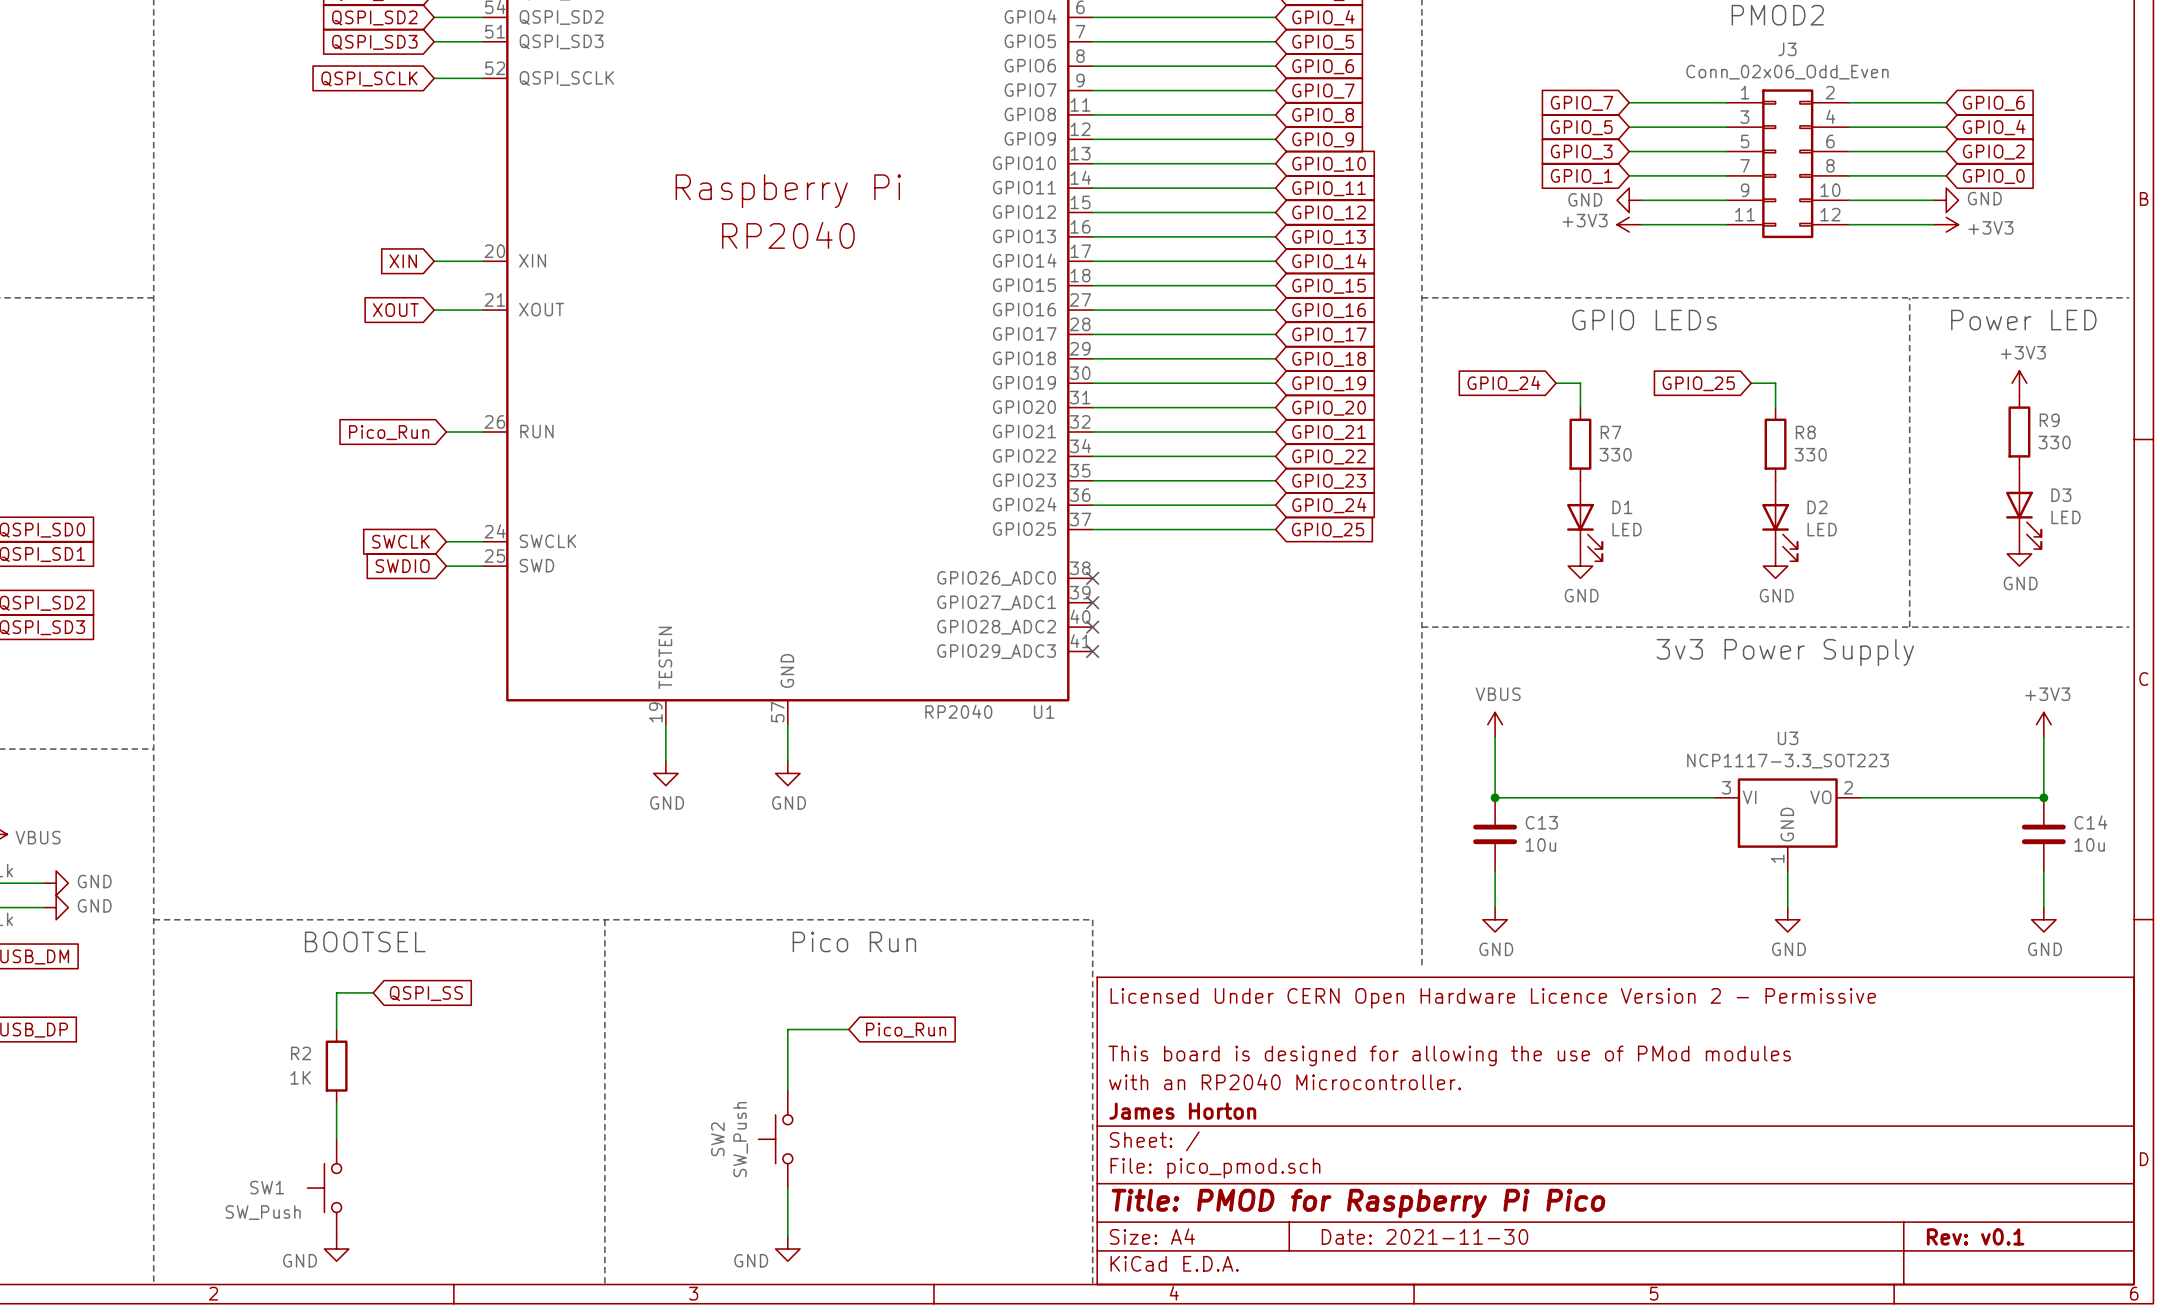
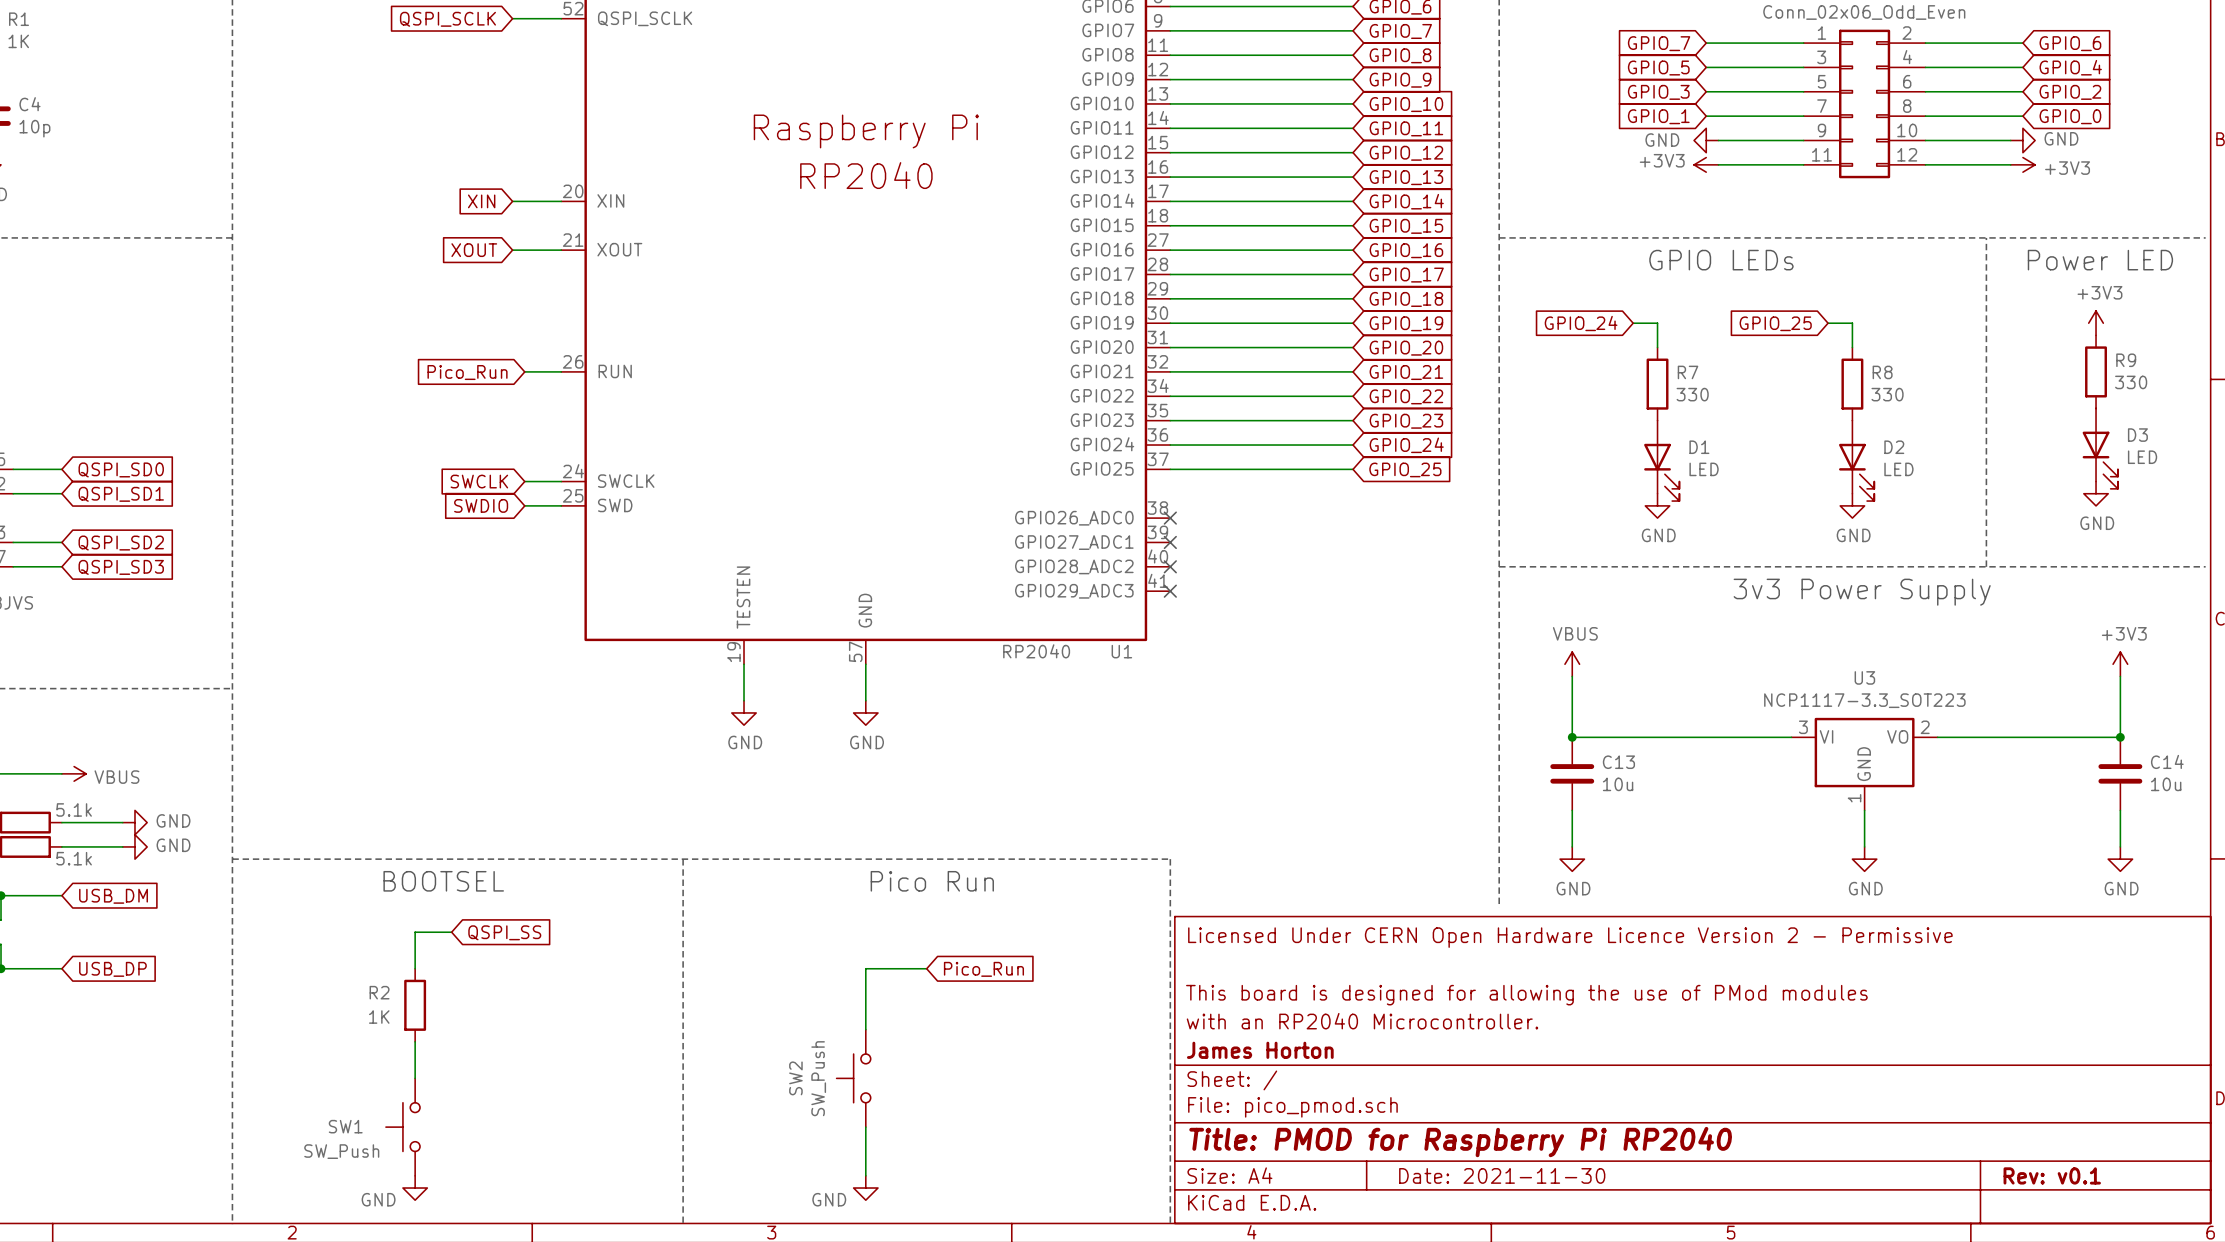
title block: Title: PMOD for Raspberry Pi Pico (1358, 1203) -> Title: PMOD for Raspberry Pi RP2040 (1460, 1142)

